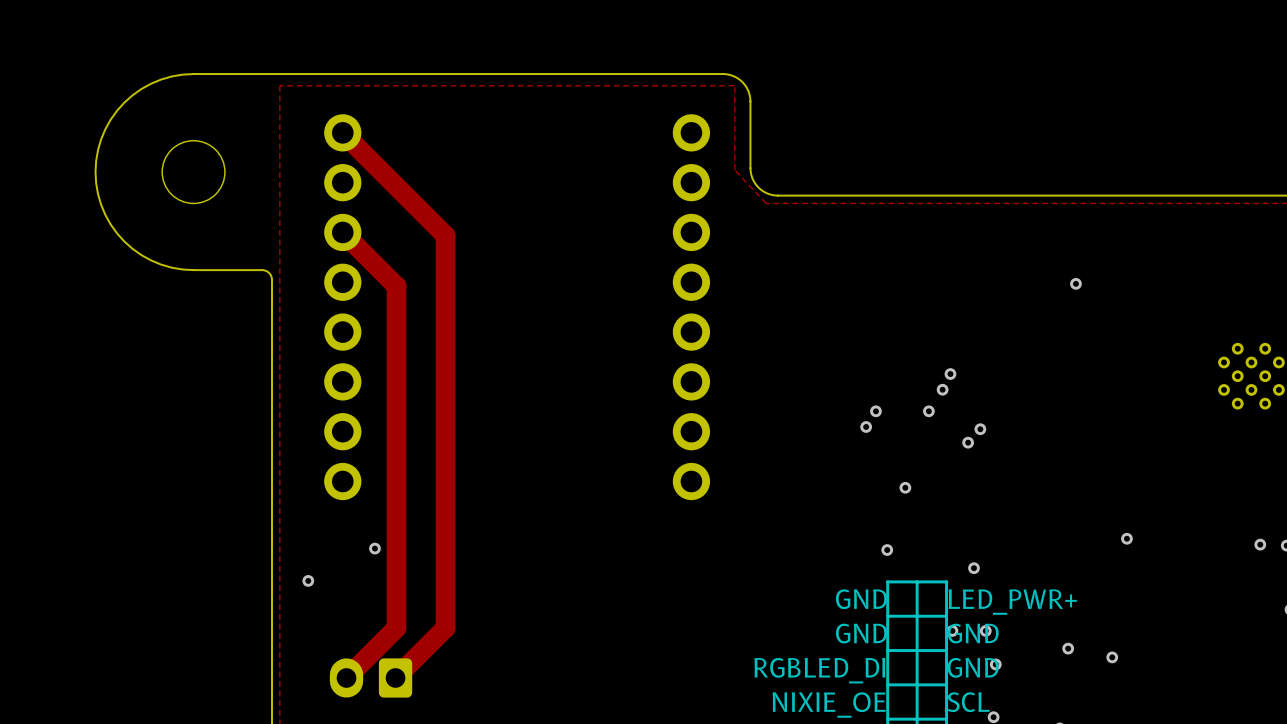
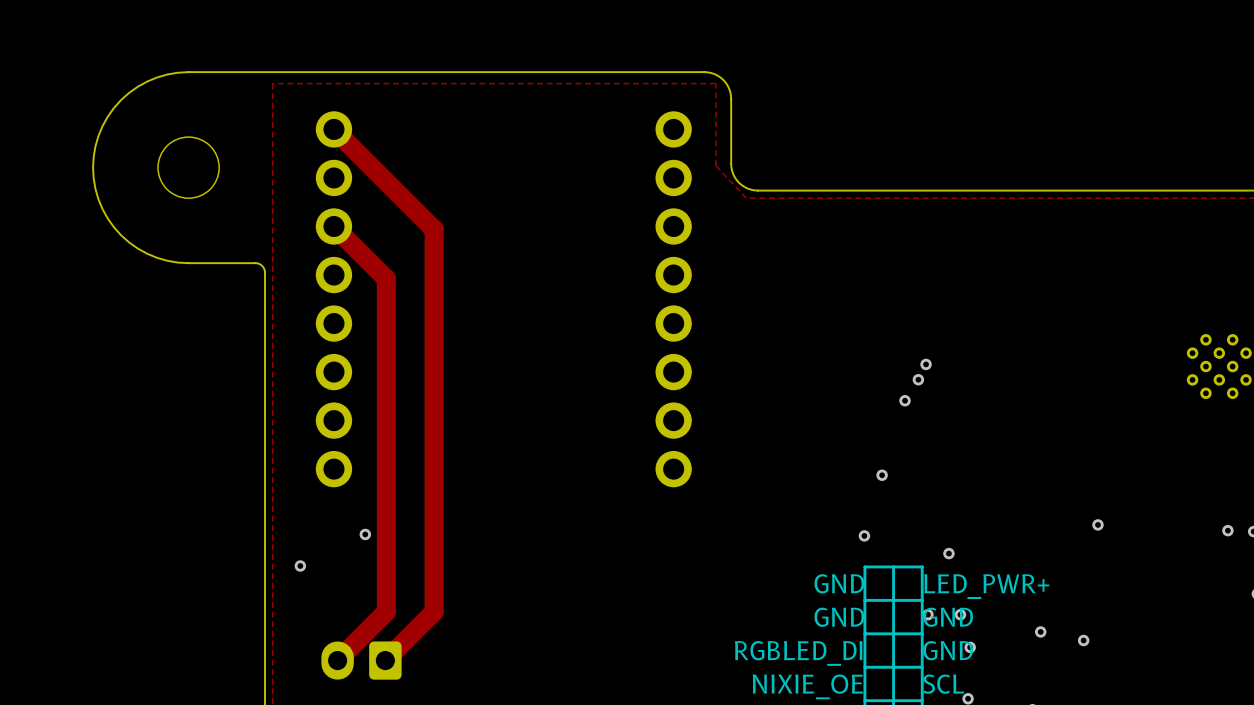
via: (1075, 283) -> none
via: (875, 411) -> none
via: (866, 426) -> none
via: (980, 429) -> none
via: (968, 442) -> none

